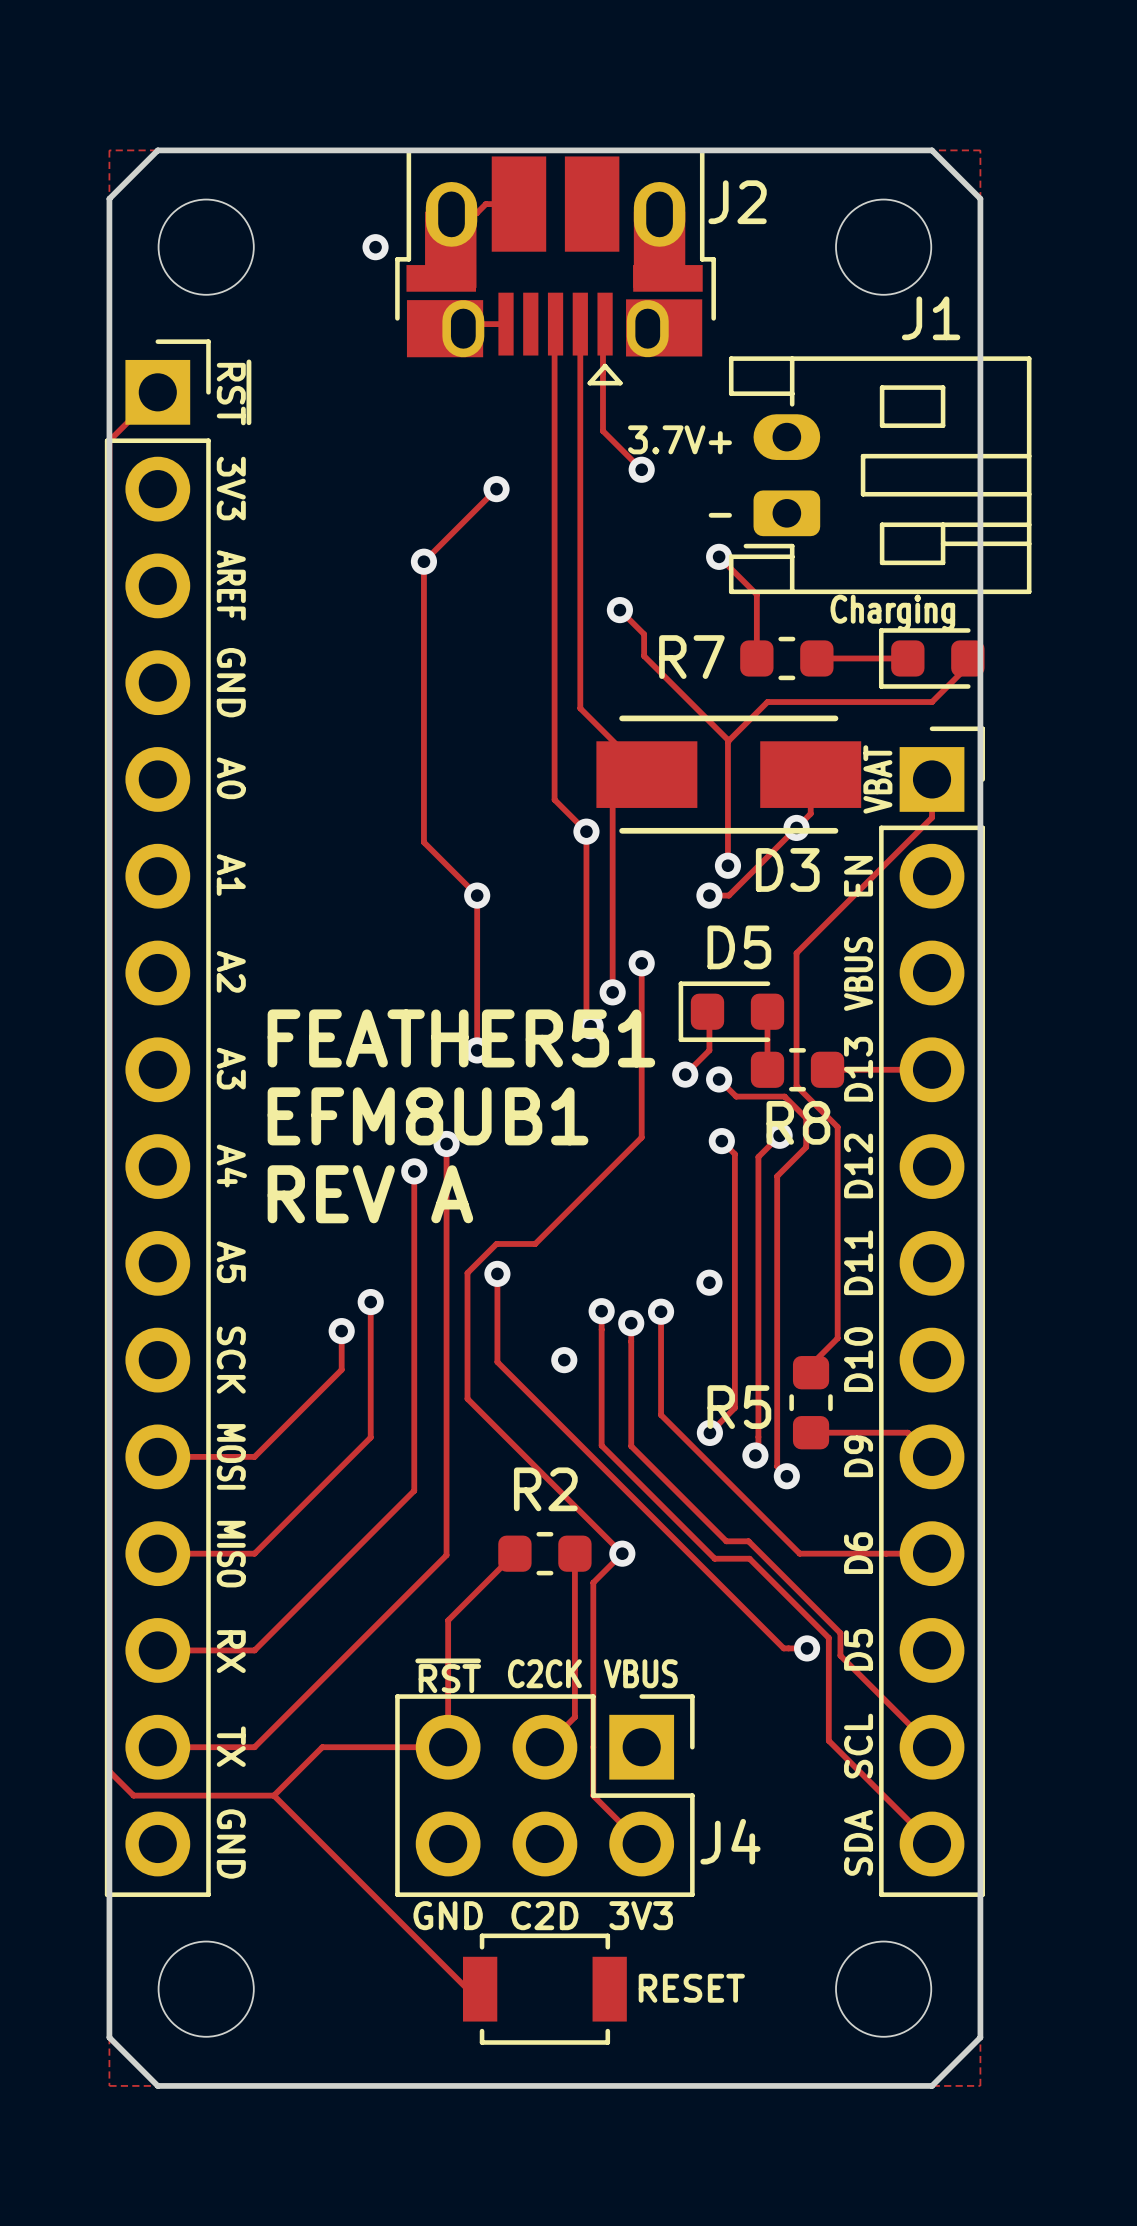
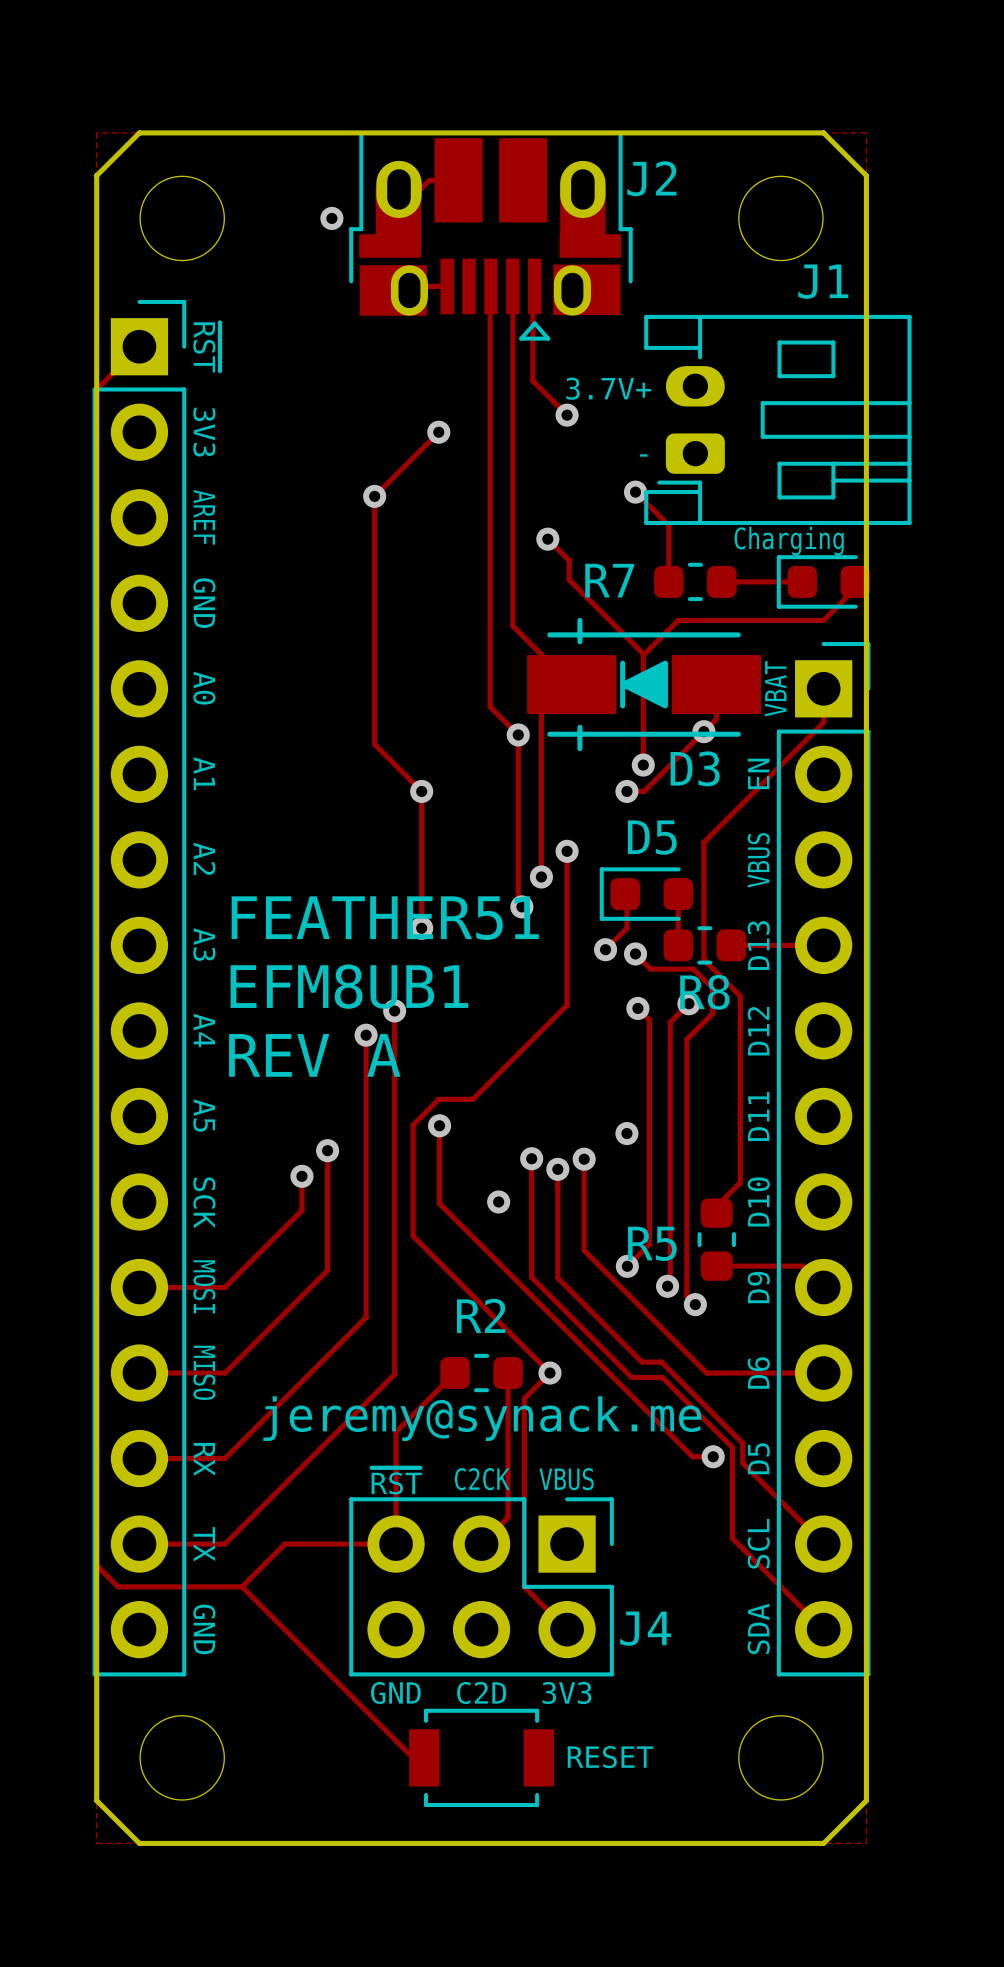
D3 footprint: [596, 715, 862, 834] -> [527, 617, 762, 752]
text: none -> jeremy@synack.me (482, 1418)

